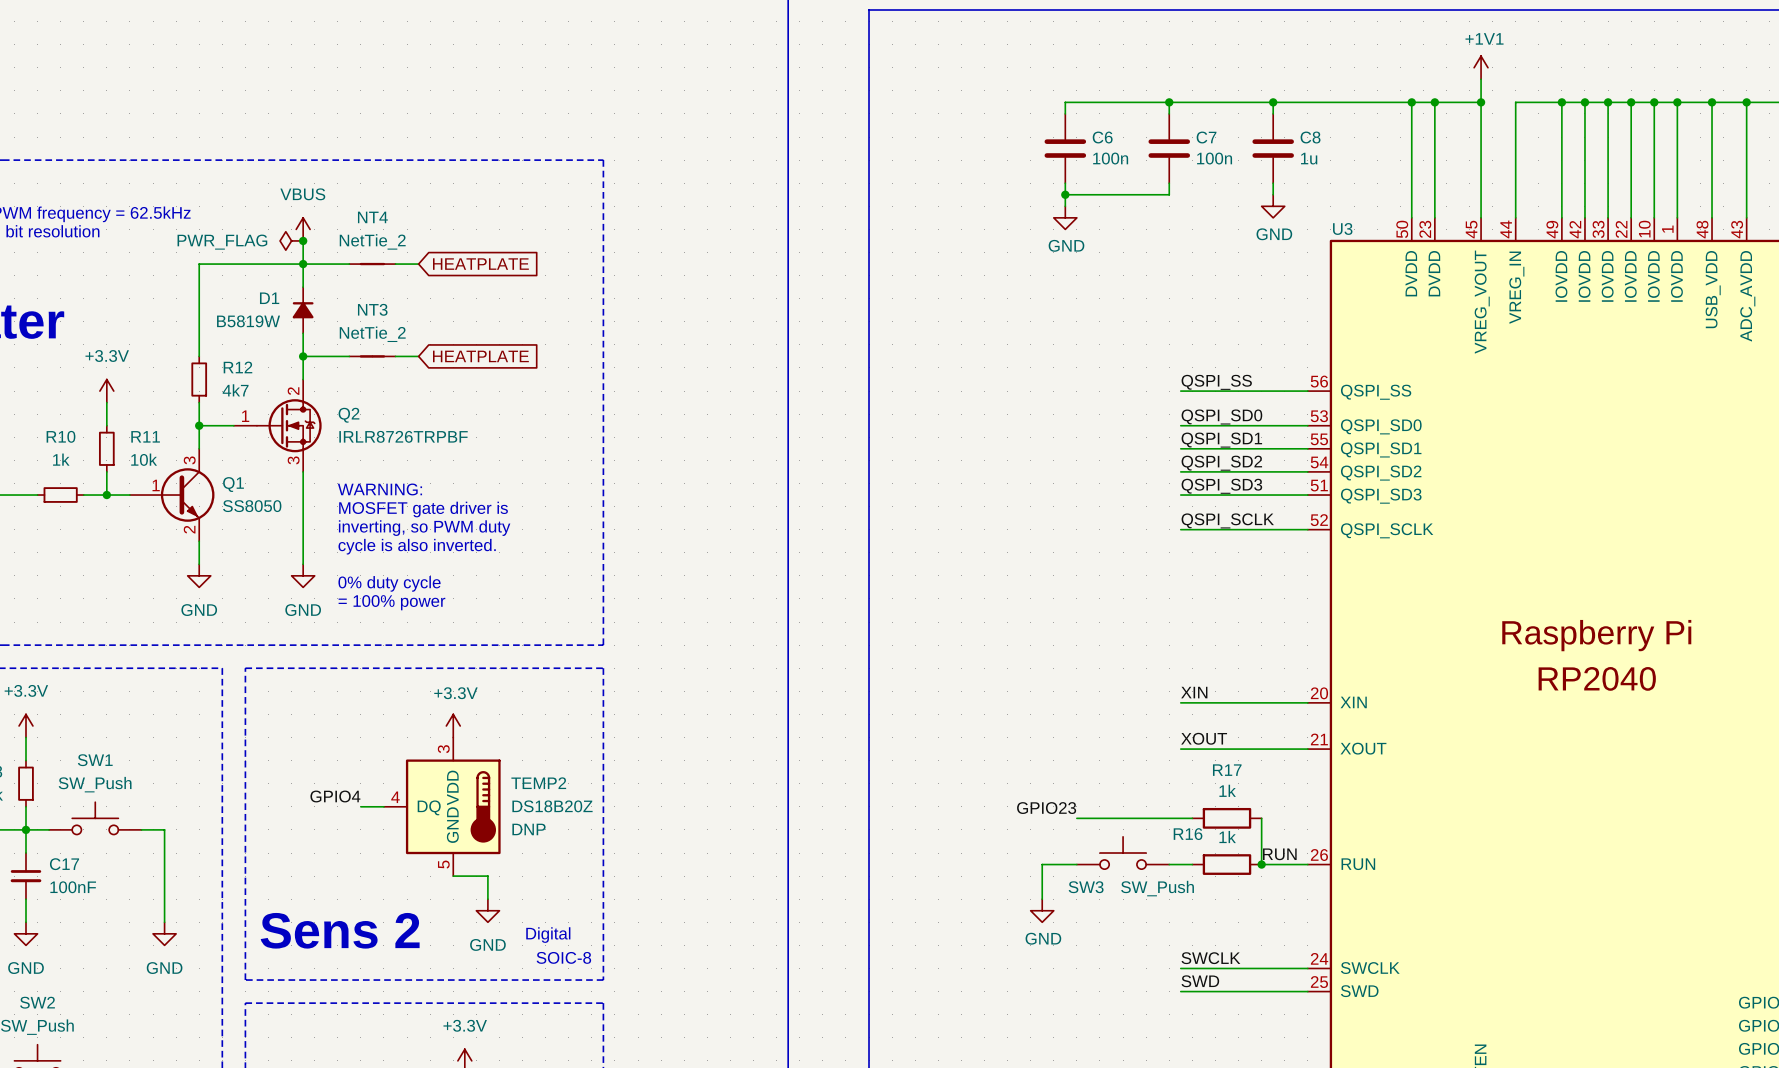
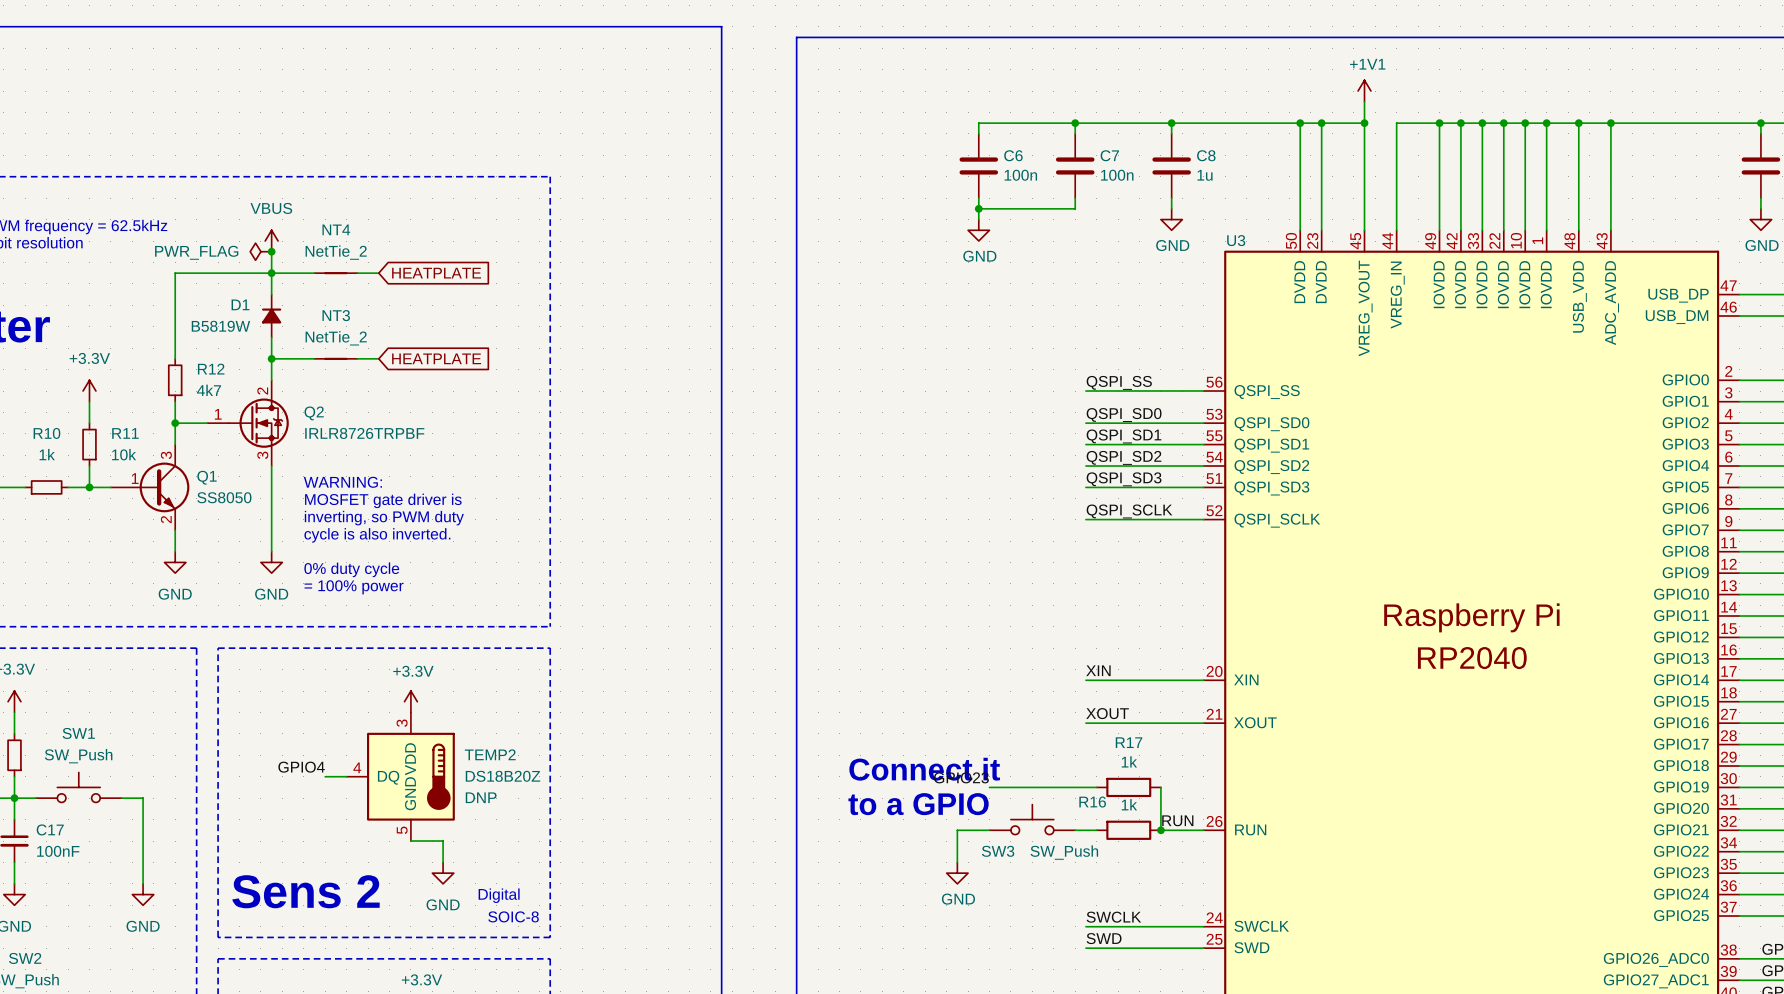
text: none -> Connect it (924, 769)
text: none -> to a GPIO (918, 804)

